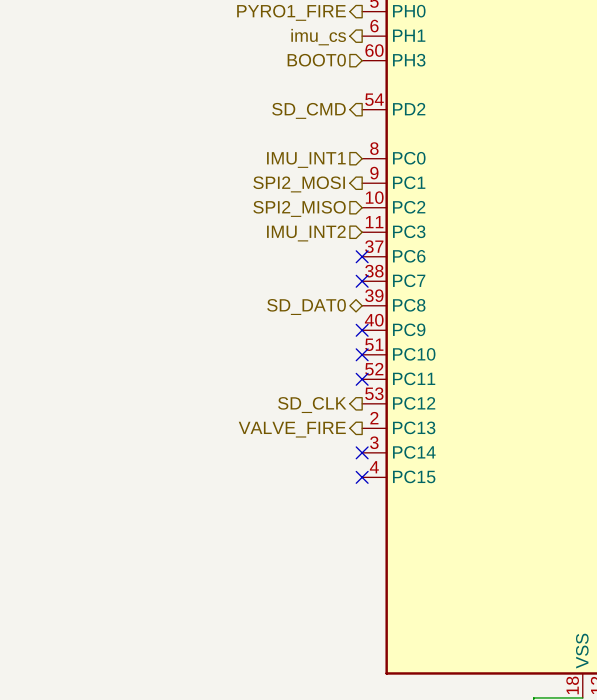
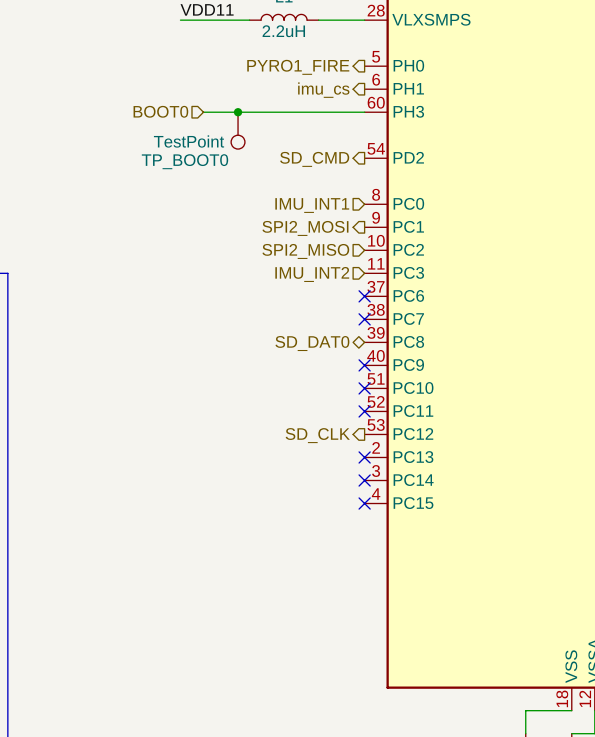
wire: none -> (203, 112) (364, 112)
junction: none -> (238, 112)
hierarchical label position: BOOT0 (316, 60) -> BOOT0 (160, 111)
TP_BOOT0: none -> TestPoint (238, 130)
no-connect mark: none -> (364, 457)
hierarchical label: VALVE_FIRE (292, 429) -> none

